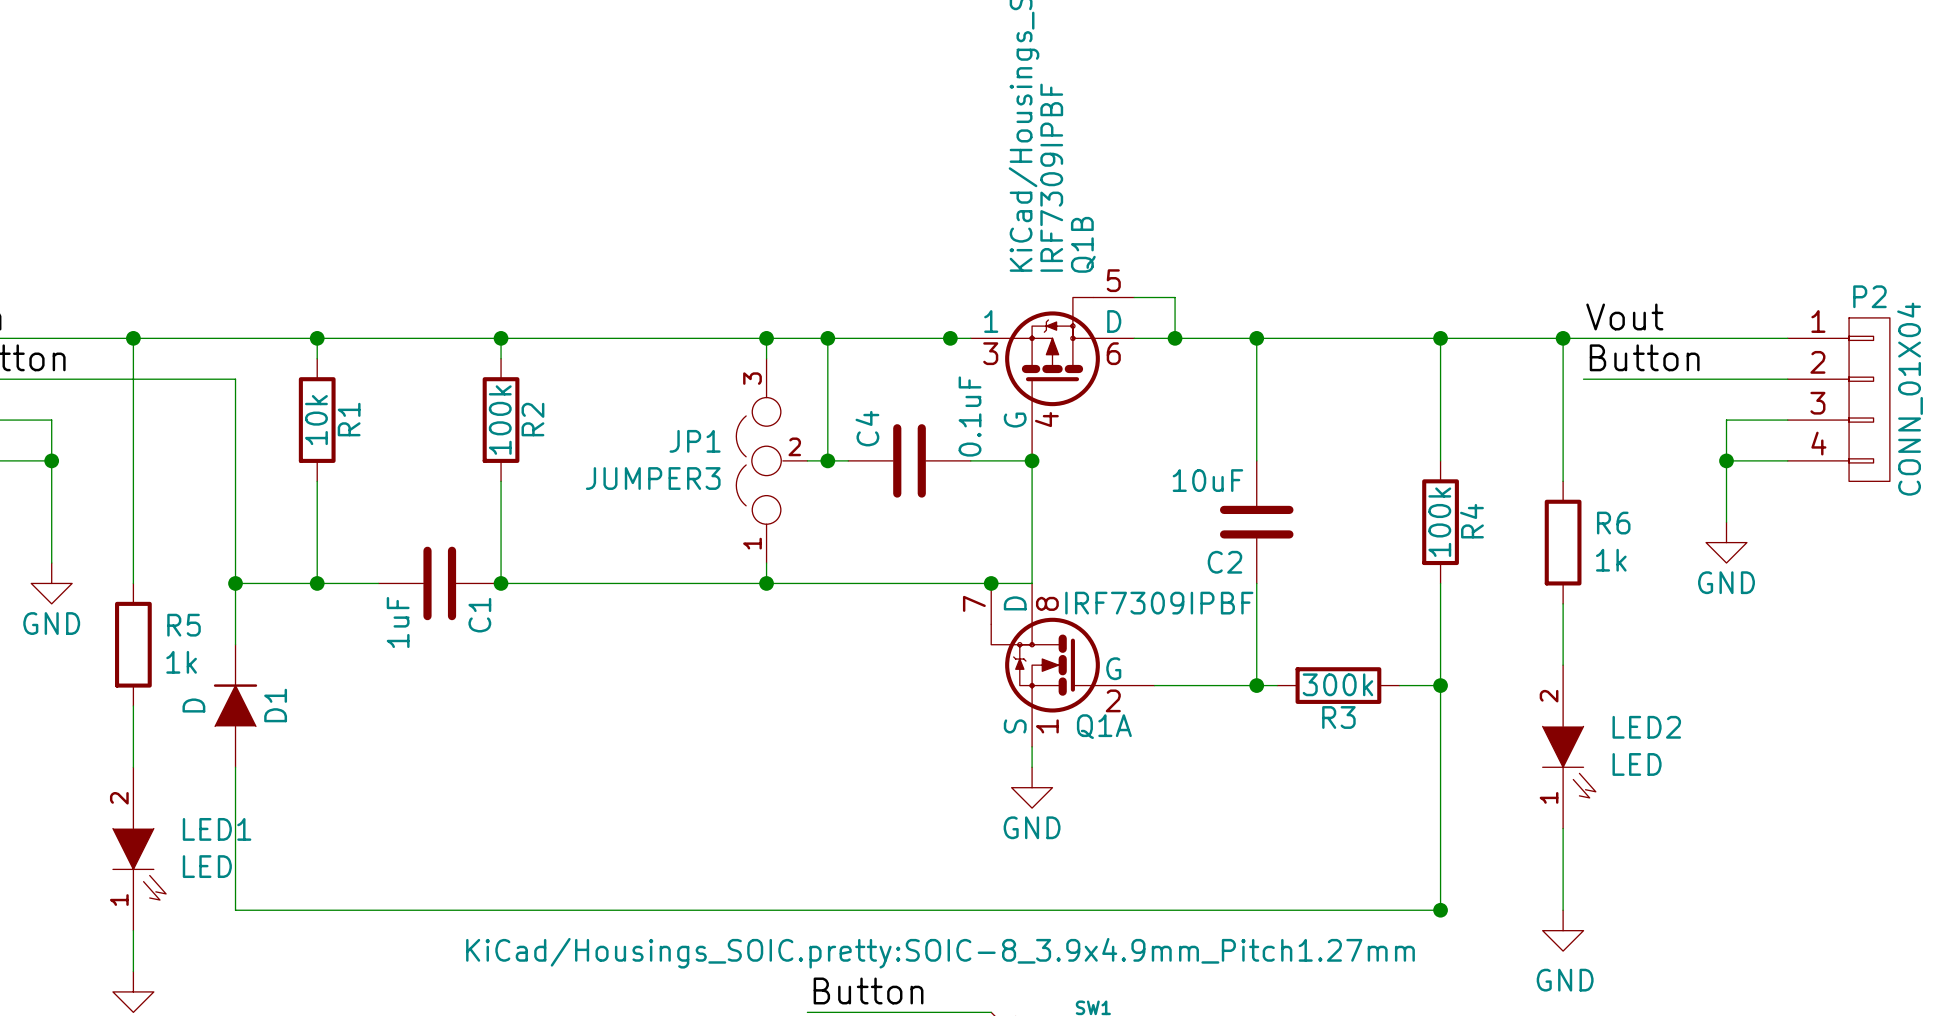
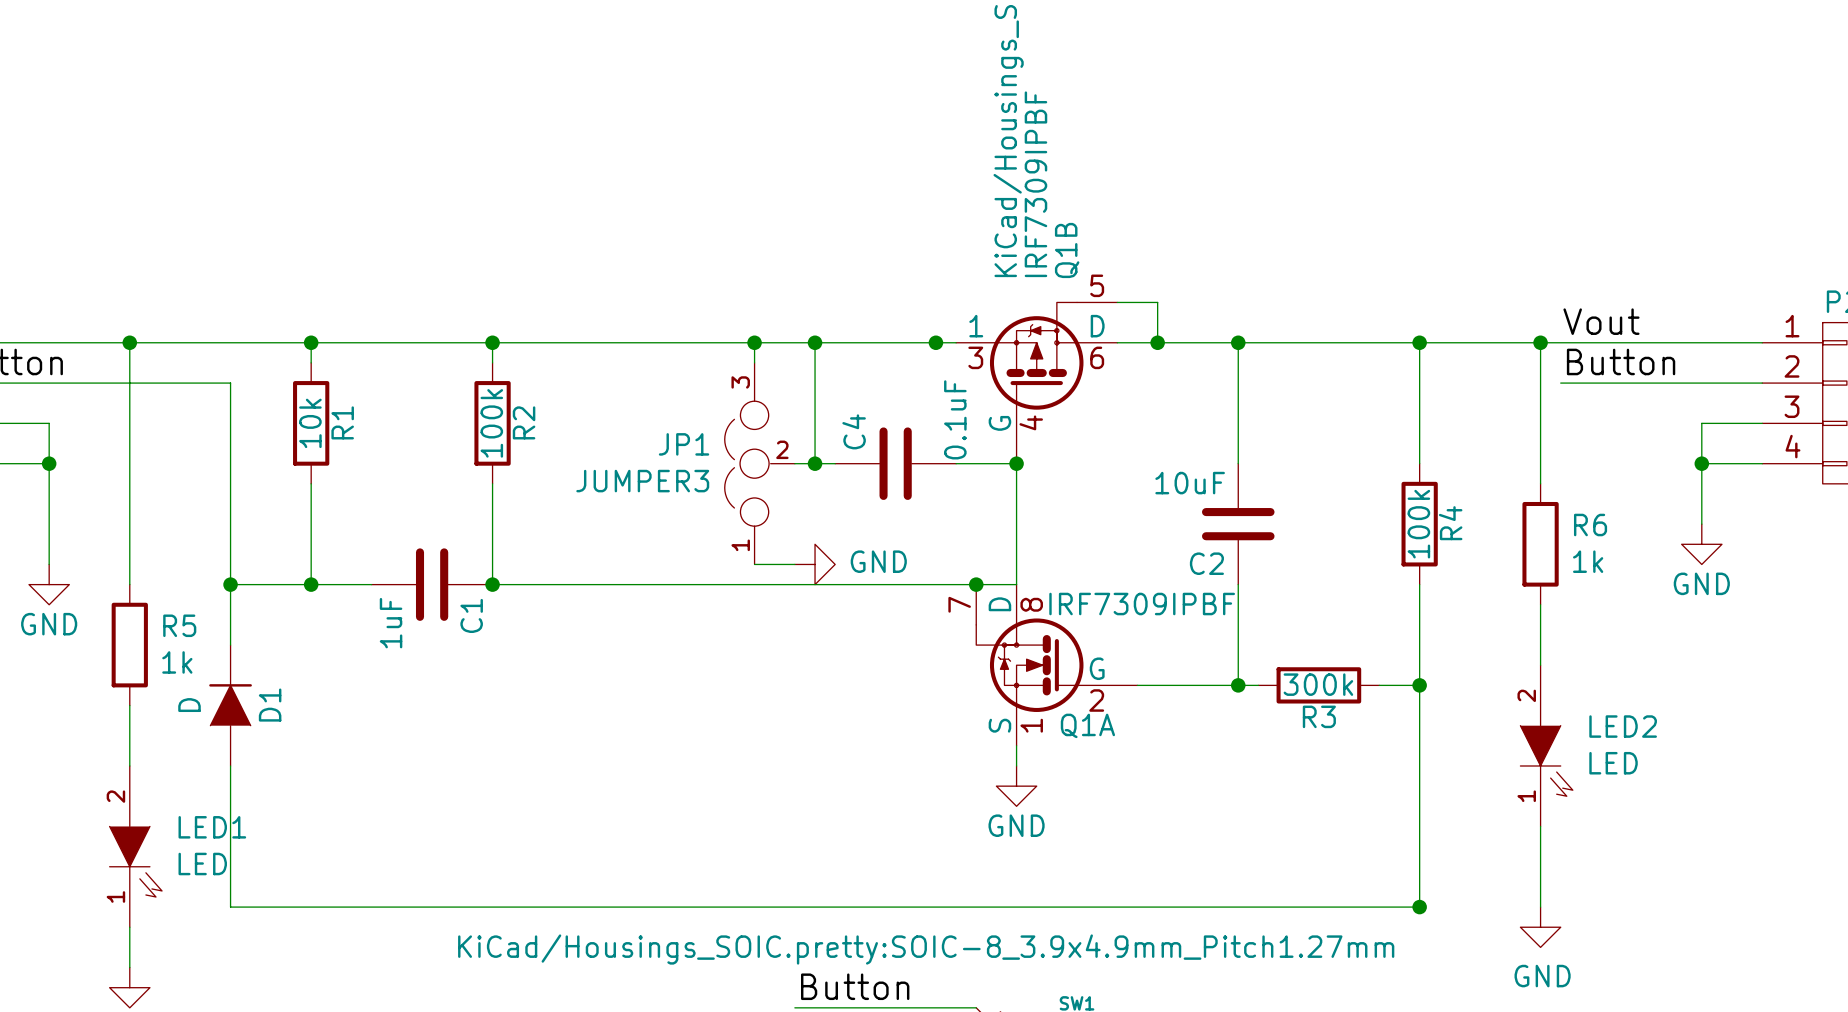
wire: (766, 563) (766, 583) -> (754, 564) (794, 564)
power symbol: none -> GND (815, 564)
junction: (766, 583) -> none

